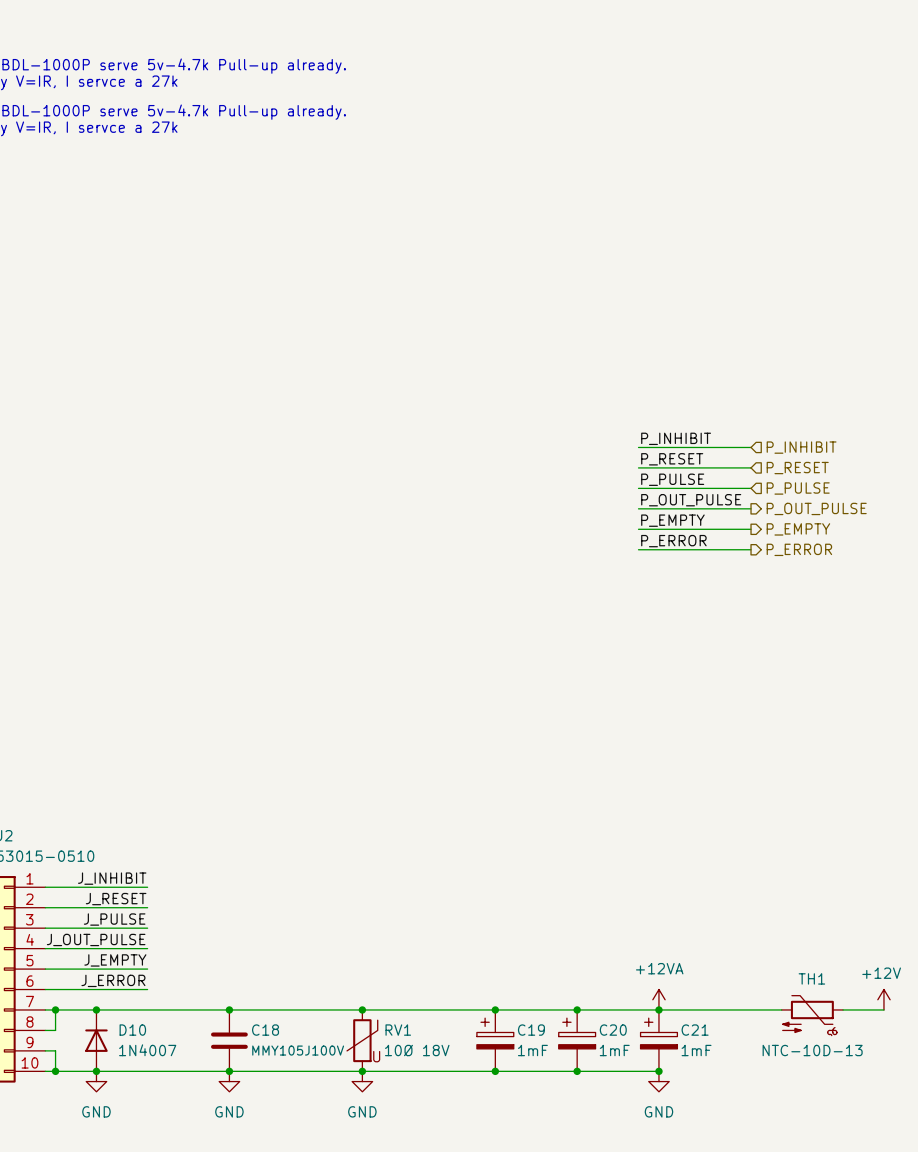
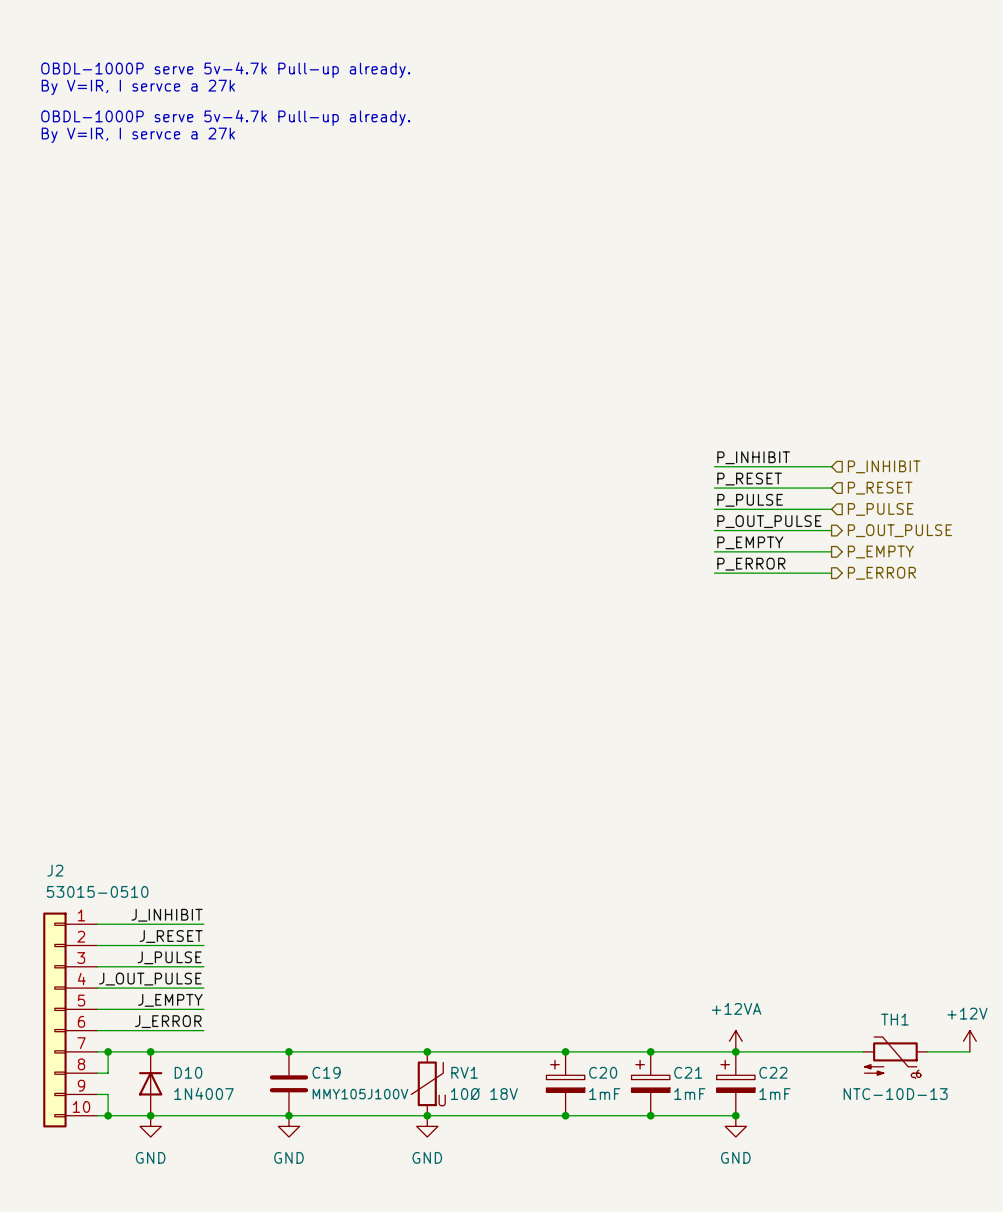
C18 name: C18 (265, 1030) -> C19 (326, 1072)
C19 name: C19 (531, 1030) -> C20 (603, 1072)
C20 name: C20 (613, 1030) -> C21 (688, 1072)
C21 name: C21 (695, 1030) -> C22 (773, 1072)

